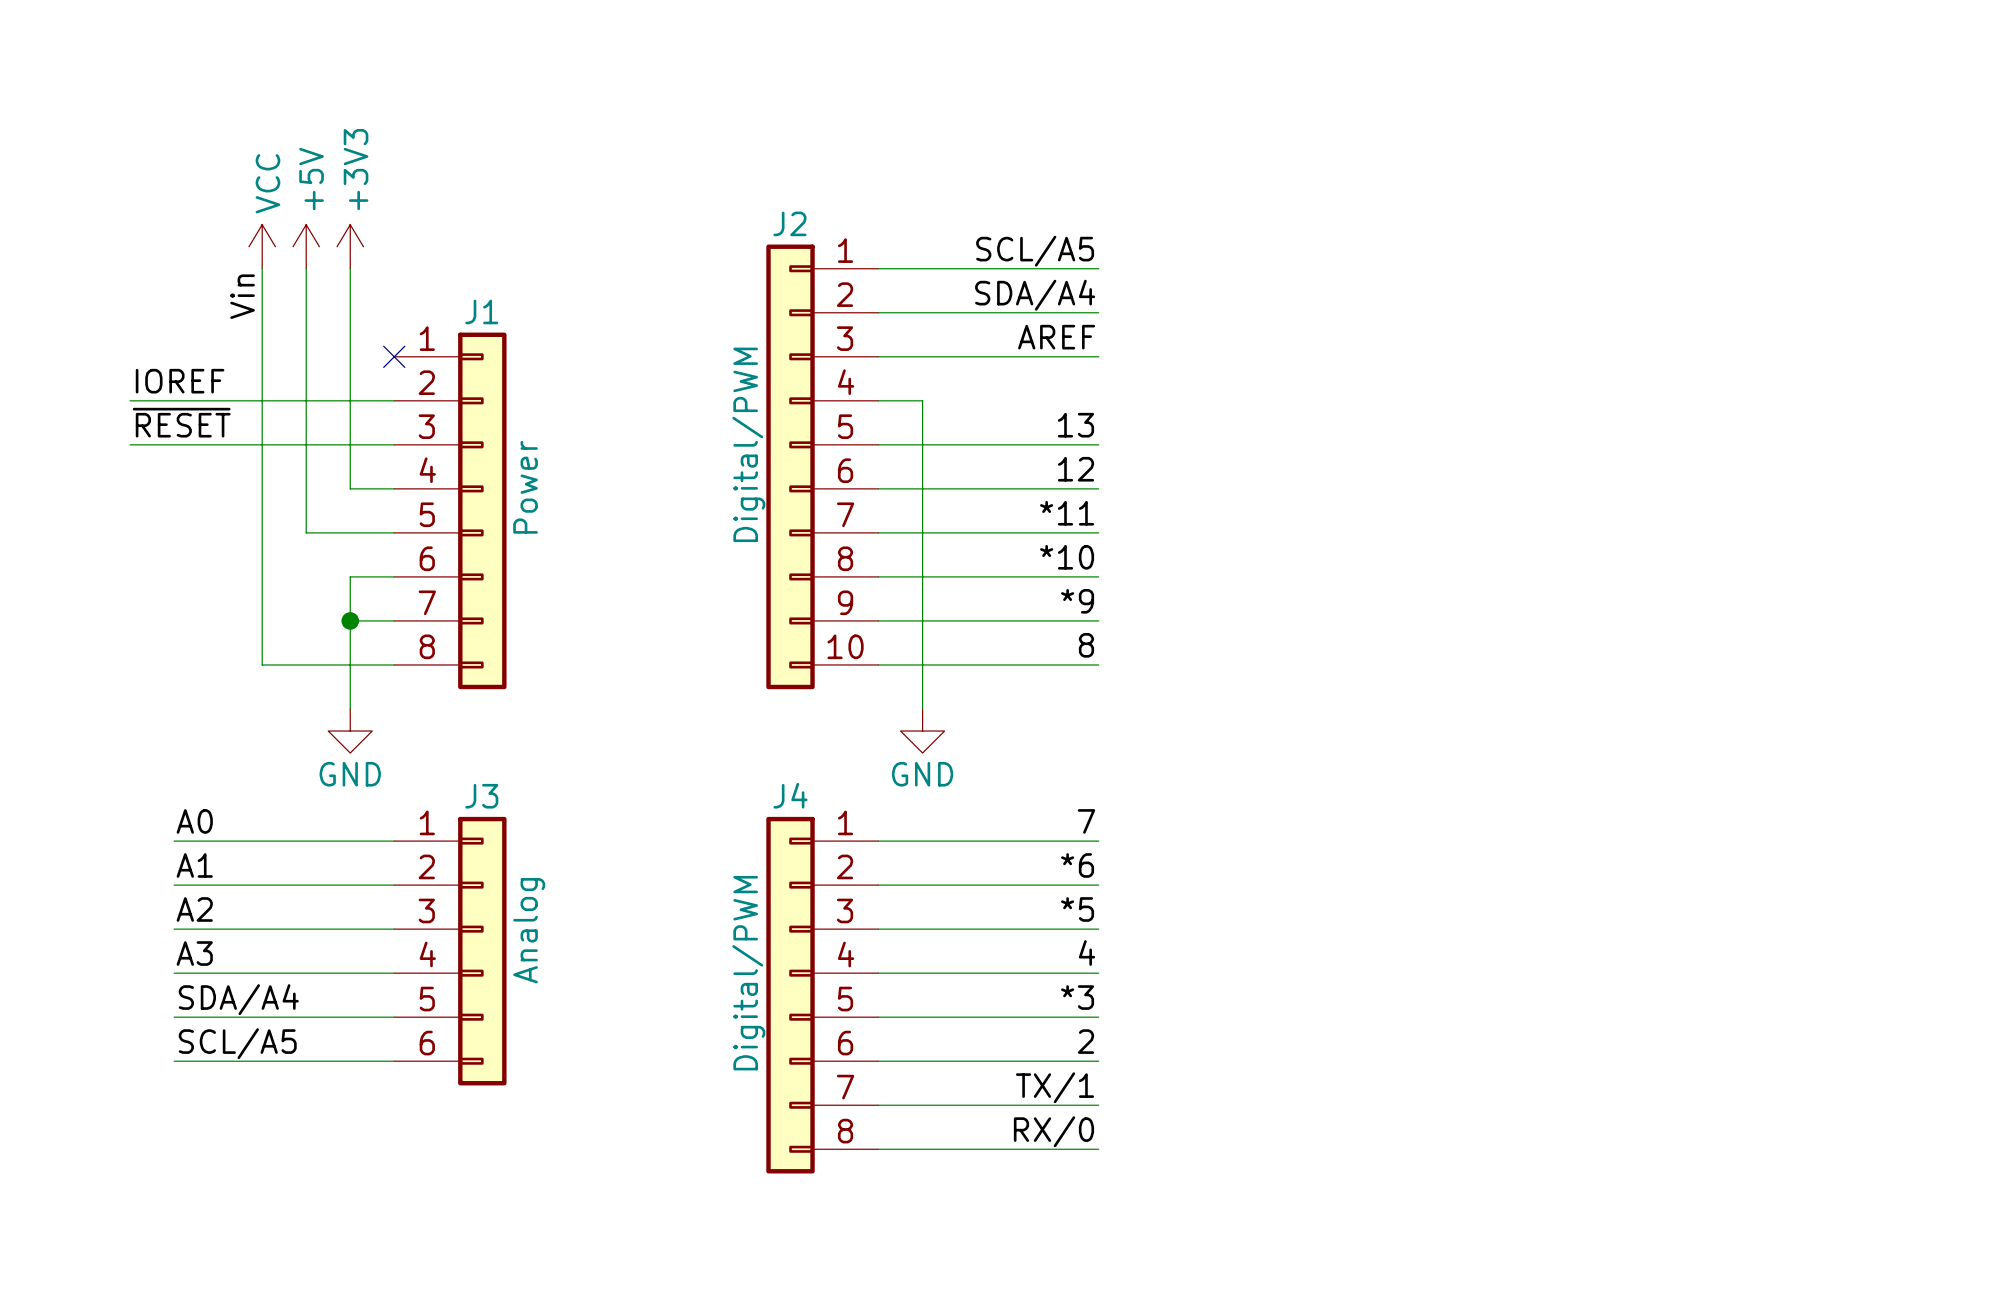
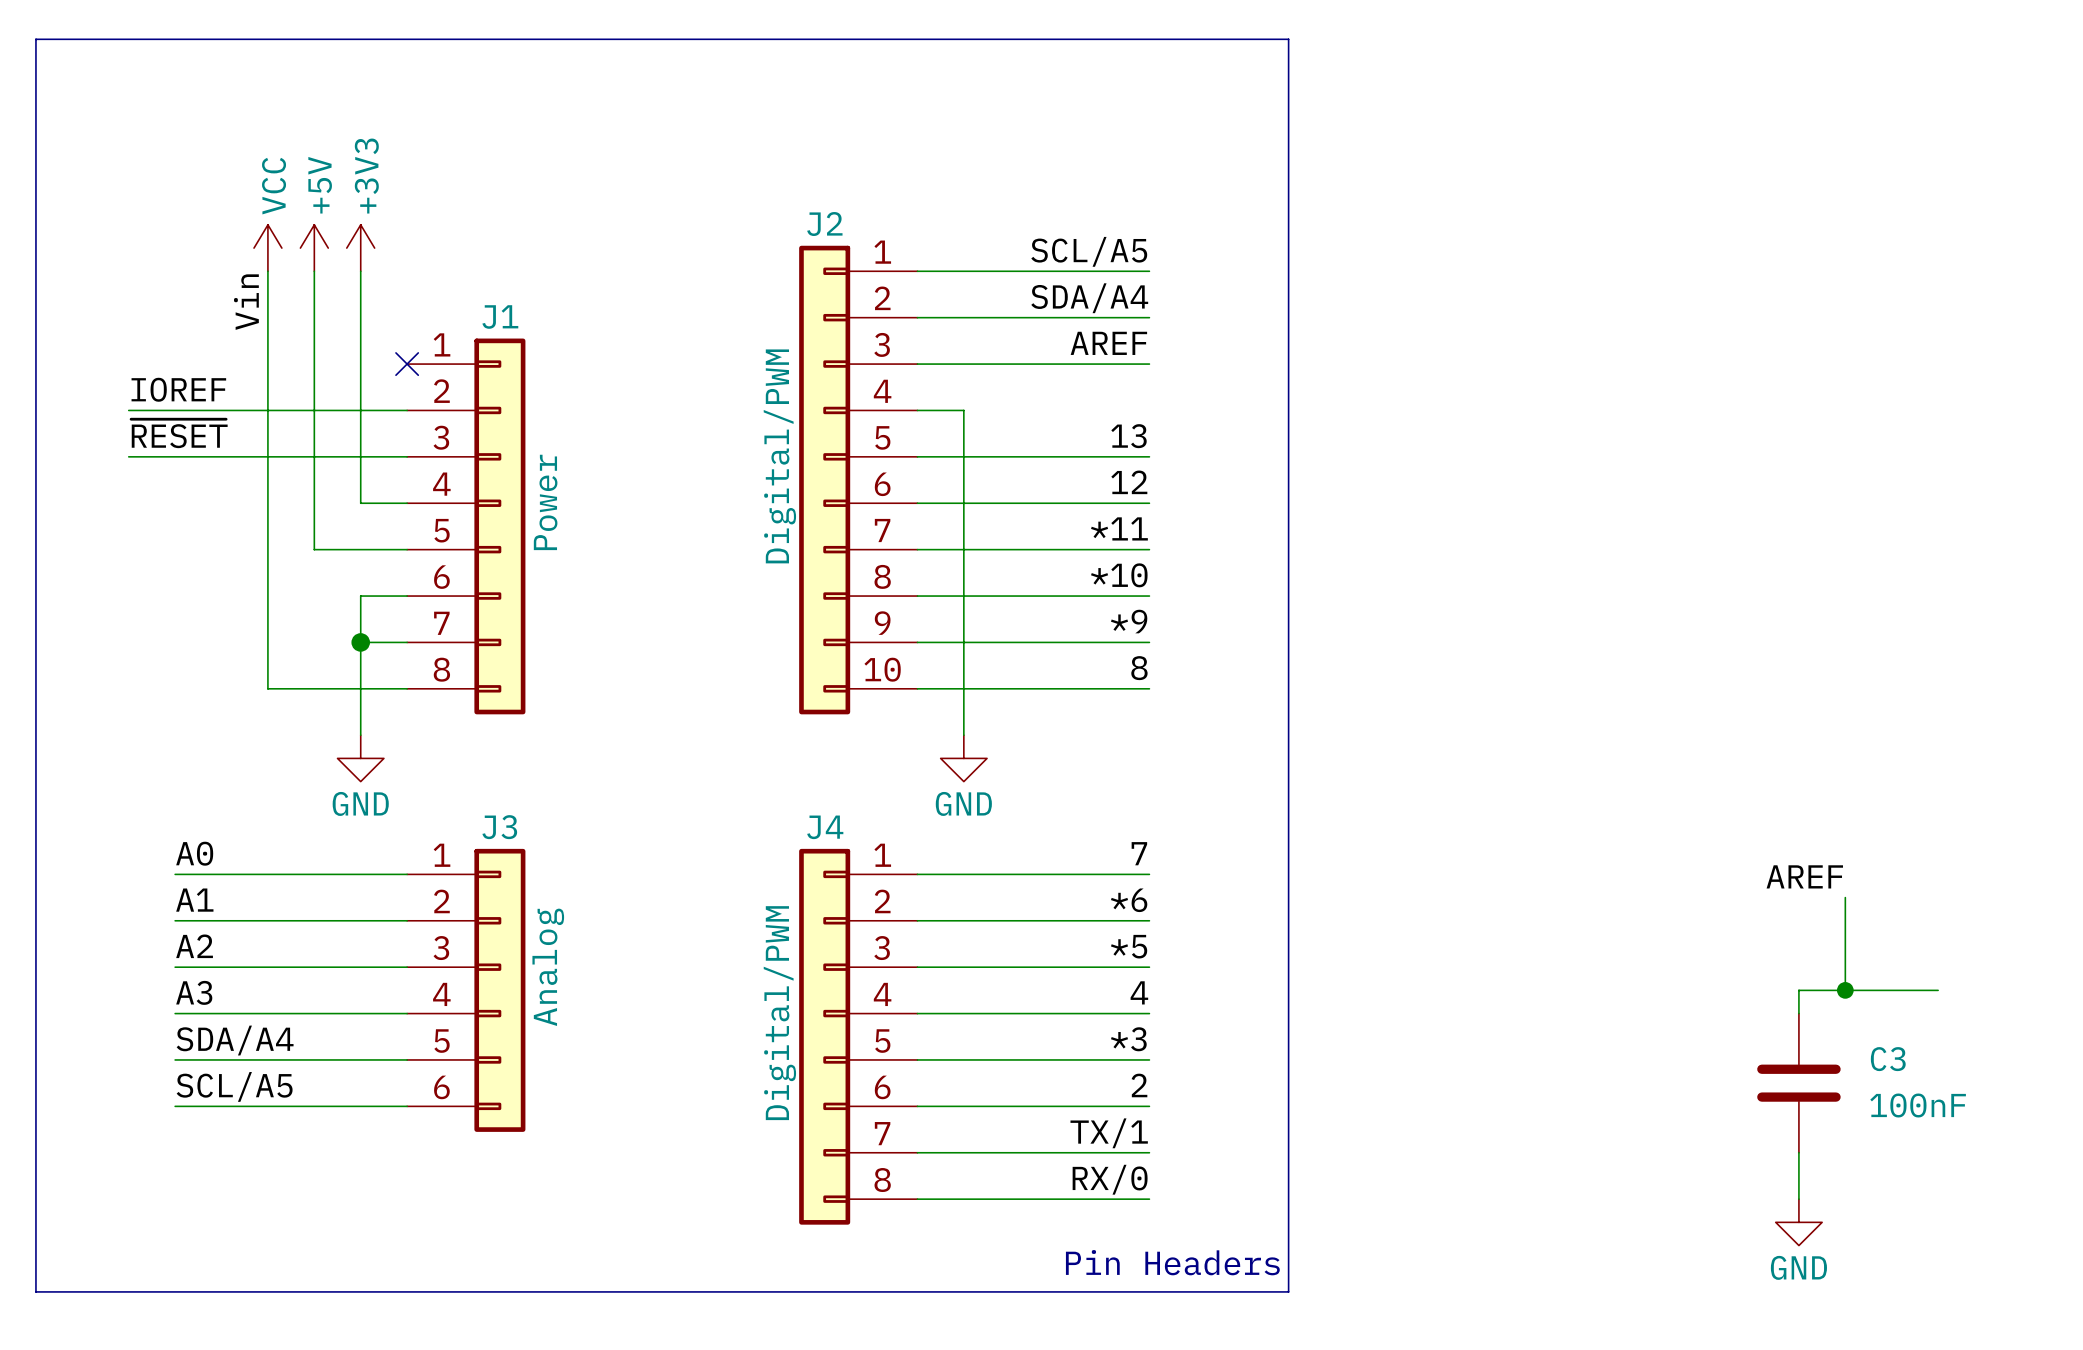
line: none -> (35, 39) (1288, 39) (1288, 1291) (35, 1291) (35, 39)
label: none -> AREF (1804, 876)
wire: none -> (1845, 897) (1845, 990)
junction: none -> (1845, 990)
wire: none -> (1938, 990) (1798, 990) (1798, 1013)
C3: none -> 100nF (1798, 1083)
wire: none -> (1798, 1152) (1798, 1199)
power symbol: none -> GND (1798, 1222)
text: none -> Pin Headers (1172, 1262)

